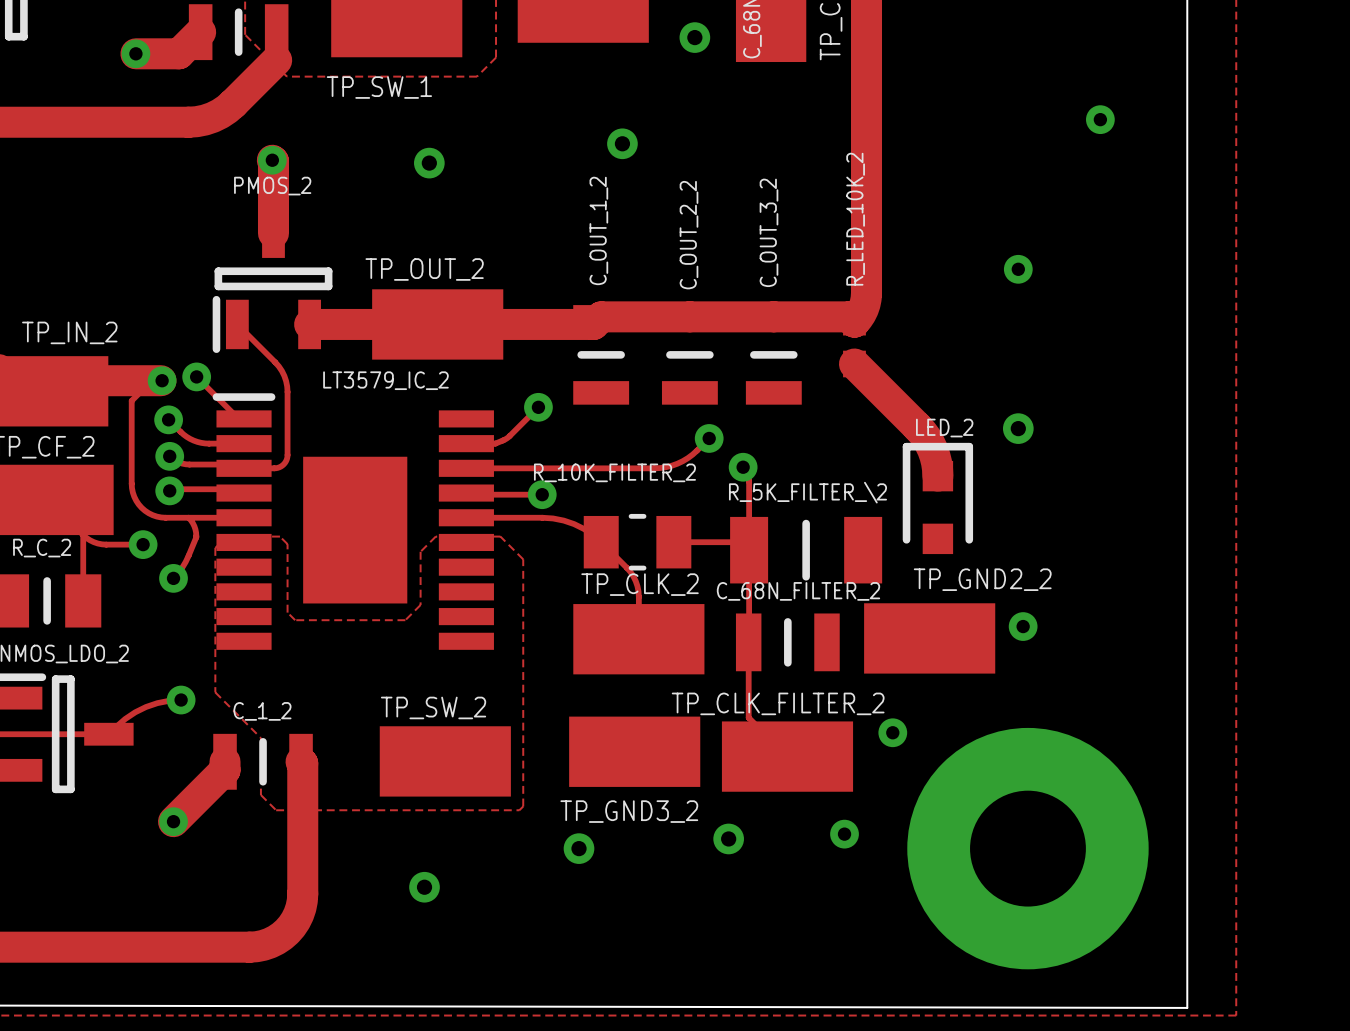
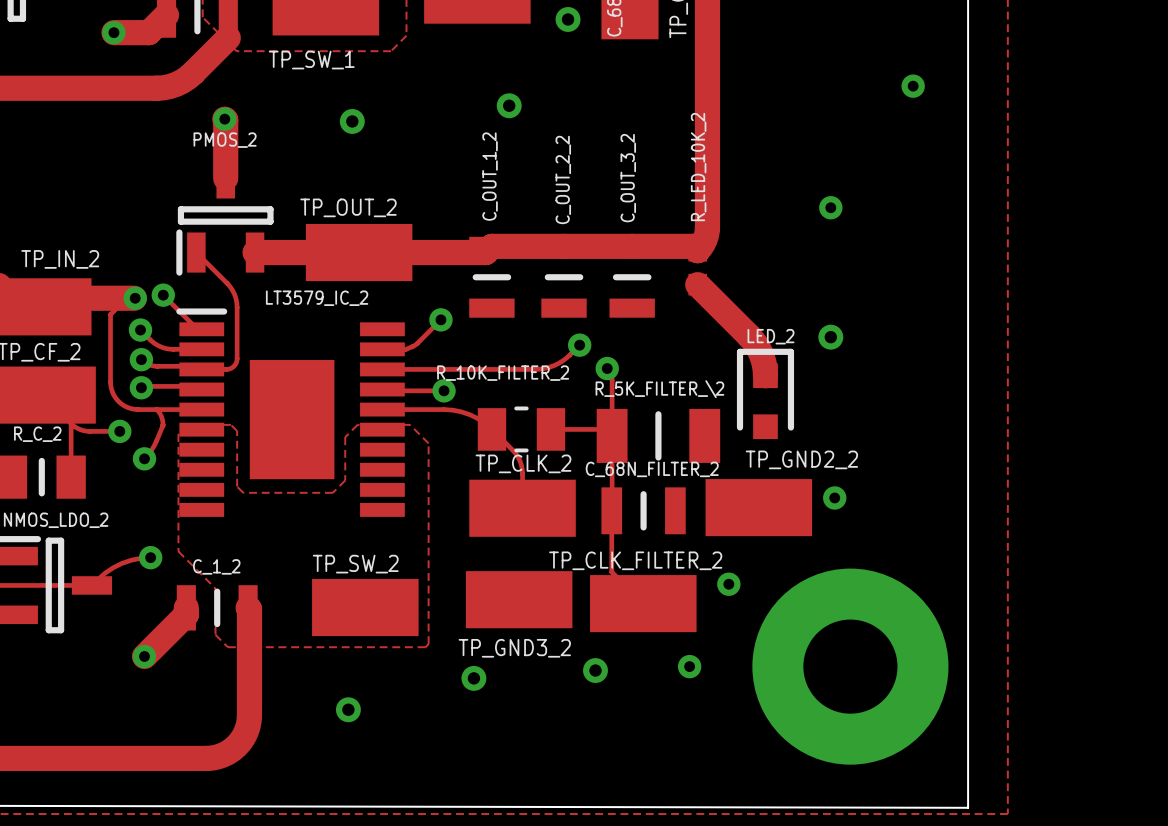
via position: (1100, 119) -> (913, 86)
part position: (1027, 848) -> (850, 666)

